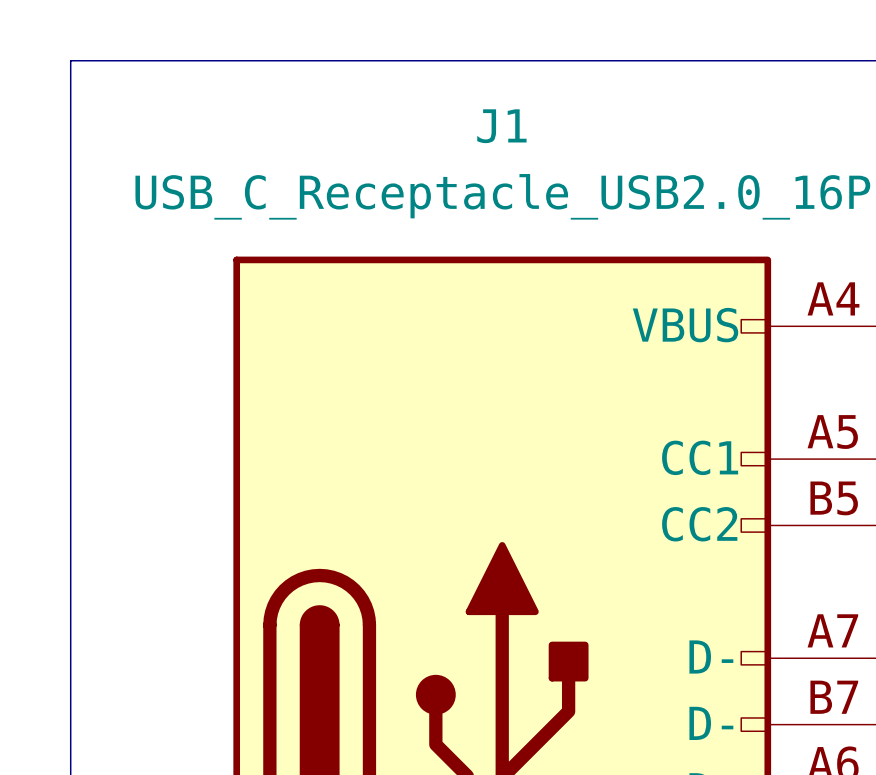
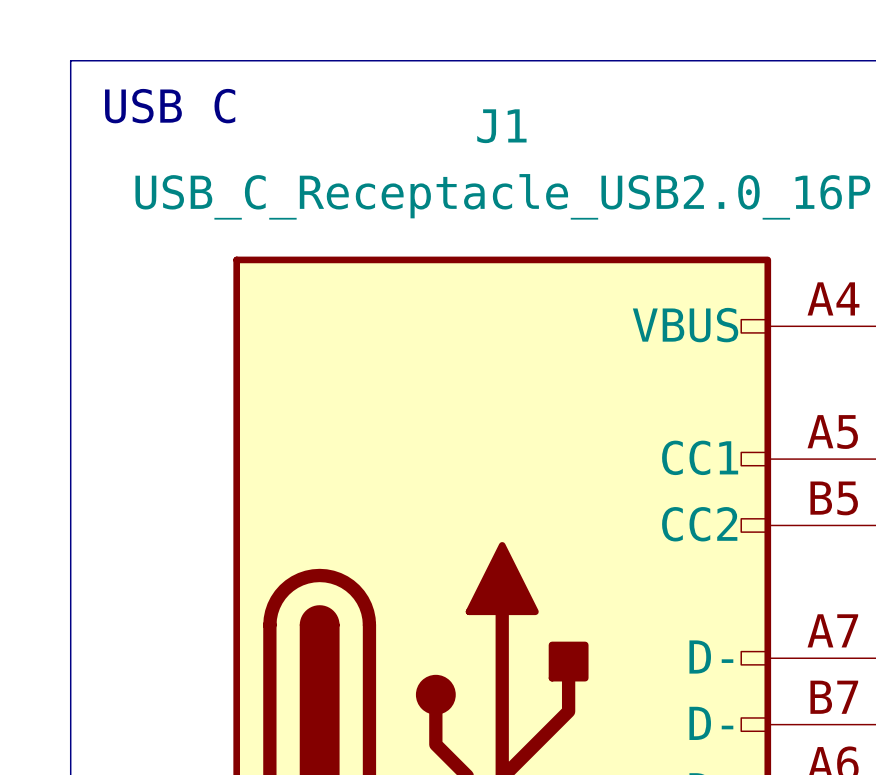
text: none -> USB C (170, 106)

